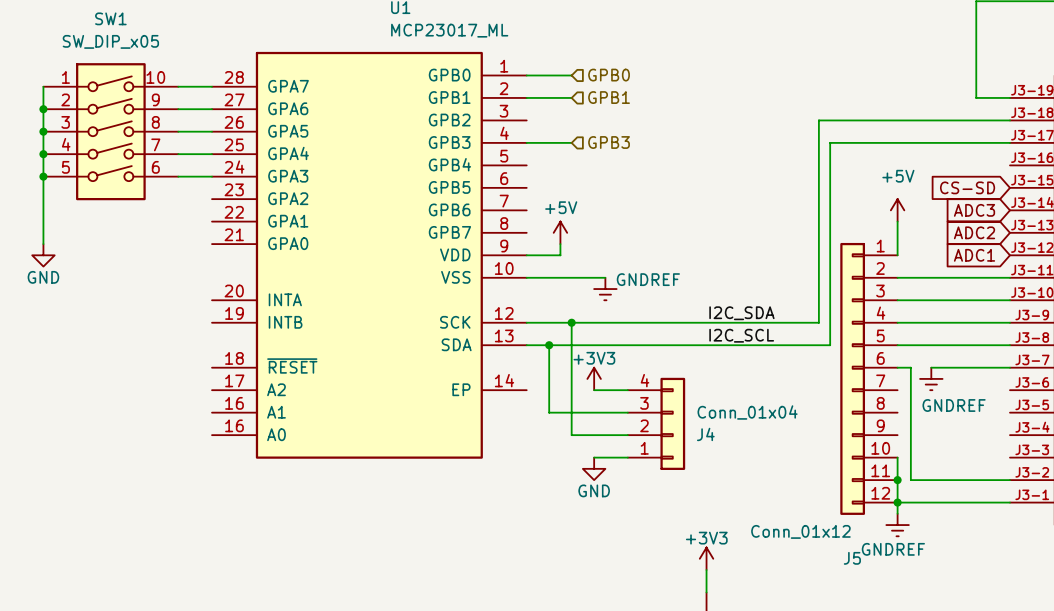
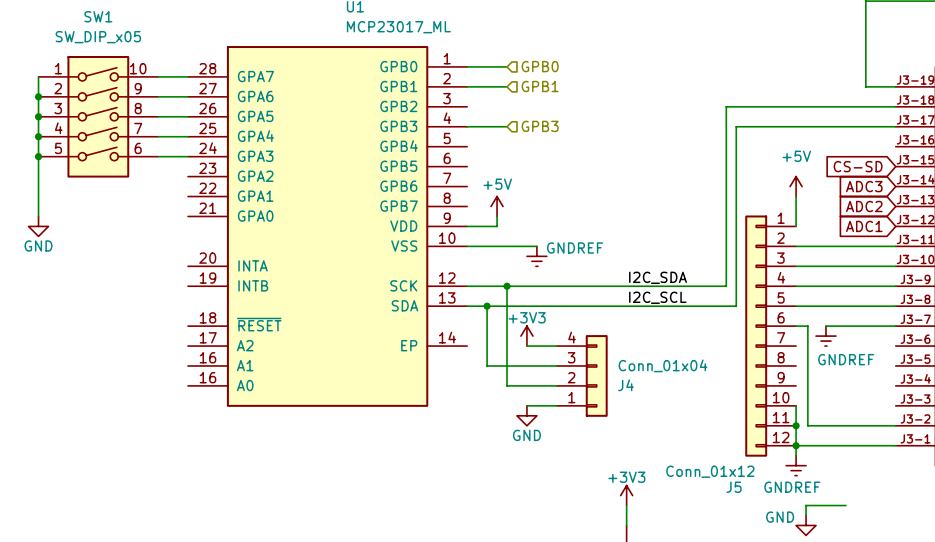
J5 name position: J5 (852, 558) -> J5 (734, 487)
wire: none -> (845, 505) (806, 505) (806, 515)
power symbol: none -> GND (806, 525)

